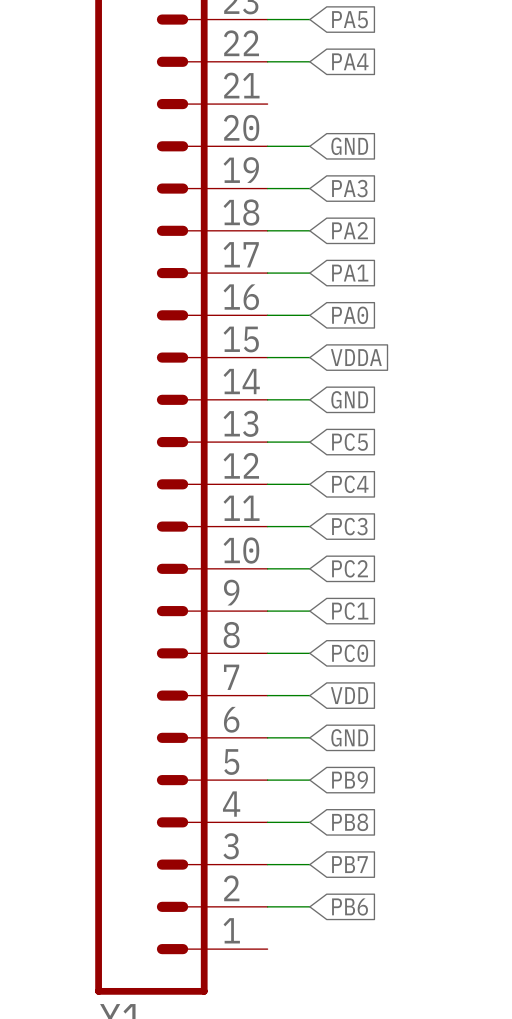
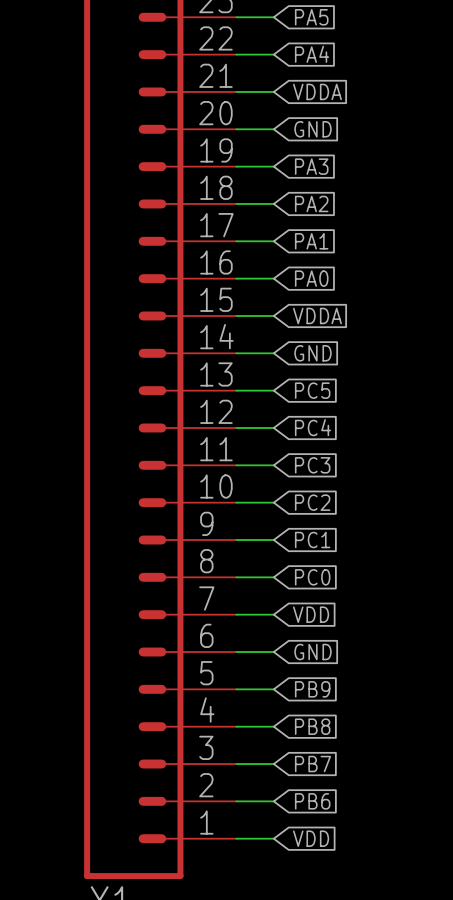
wire: none -> (236, 91) (273, 91)
global label: none -> VDDA (317, 91)
wire: none -> (236, 838) (273, 838)
global label: none -> VDD (311, 838)

